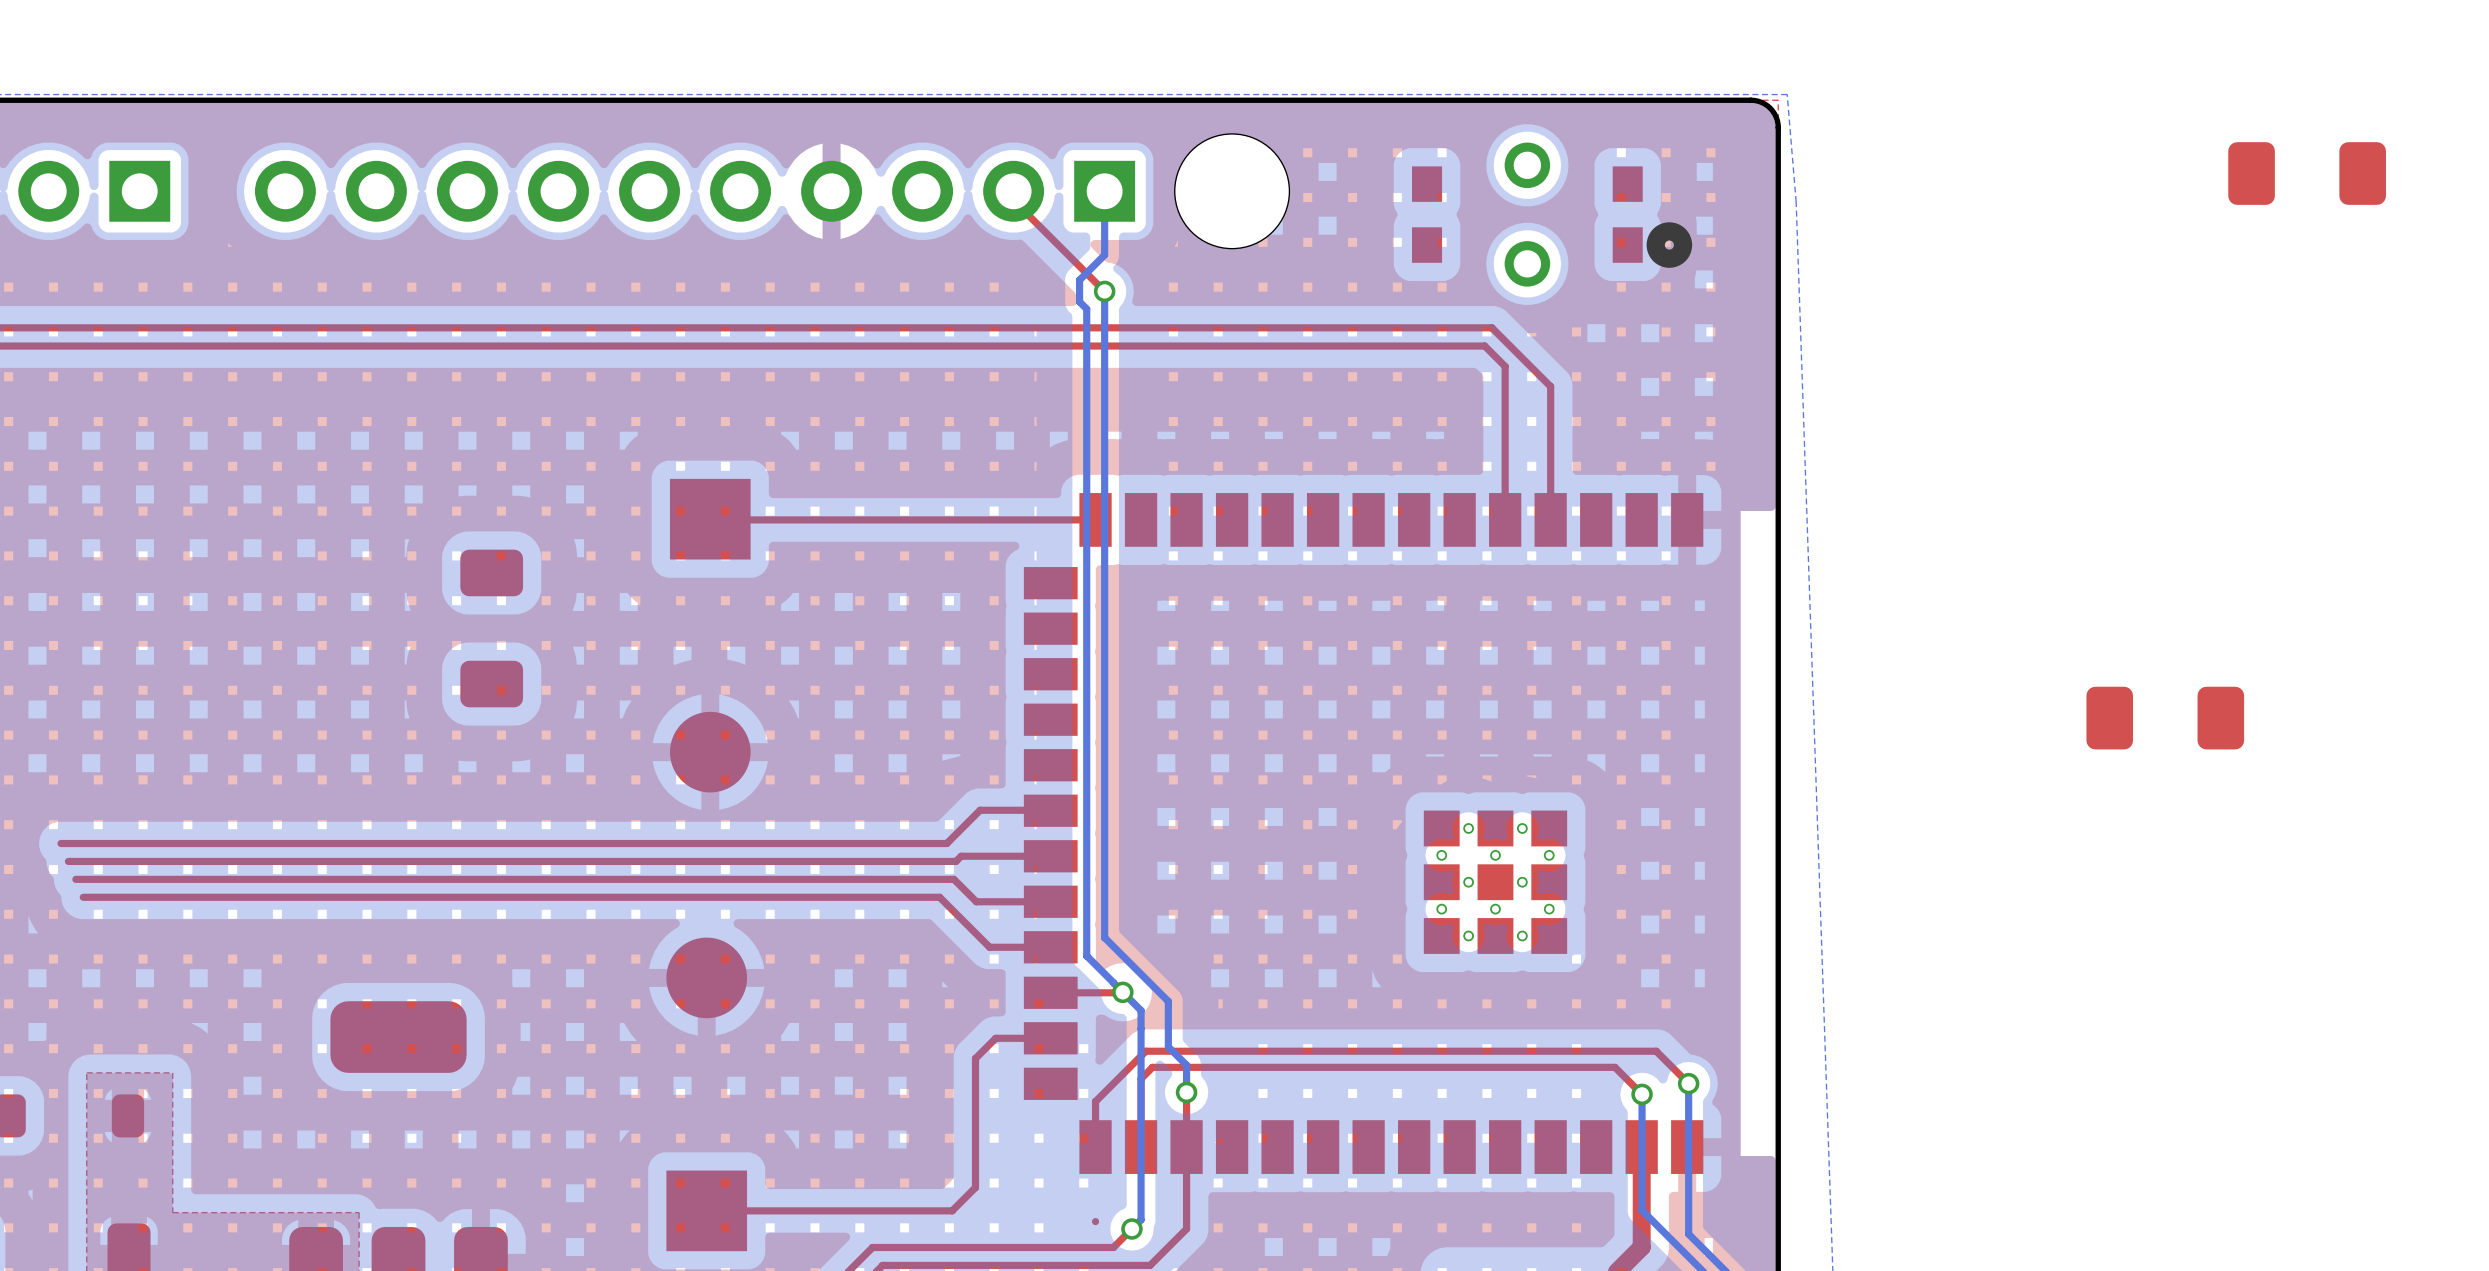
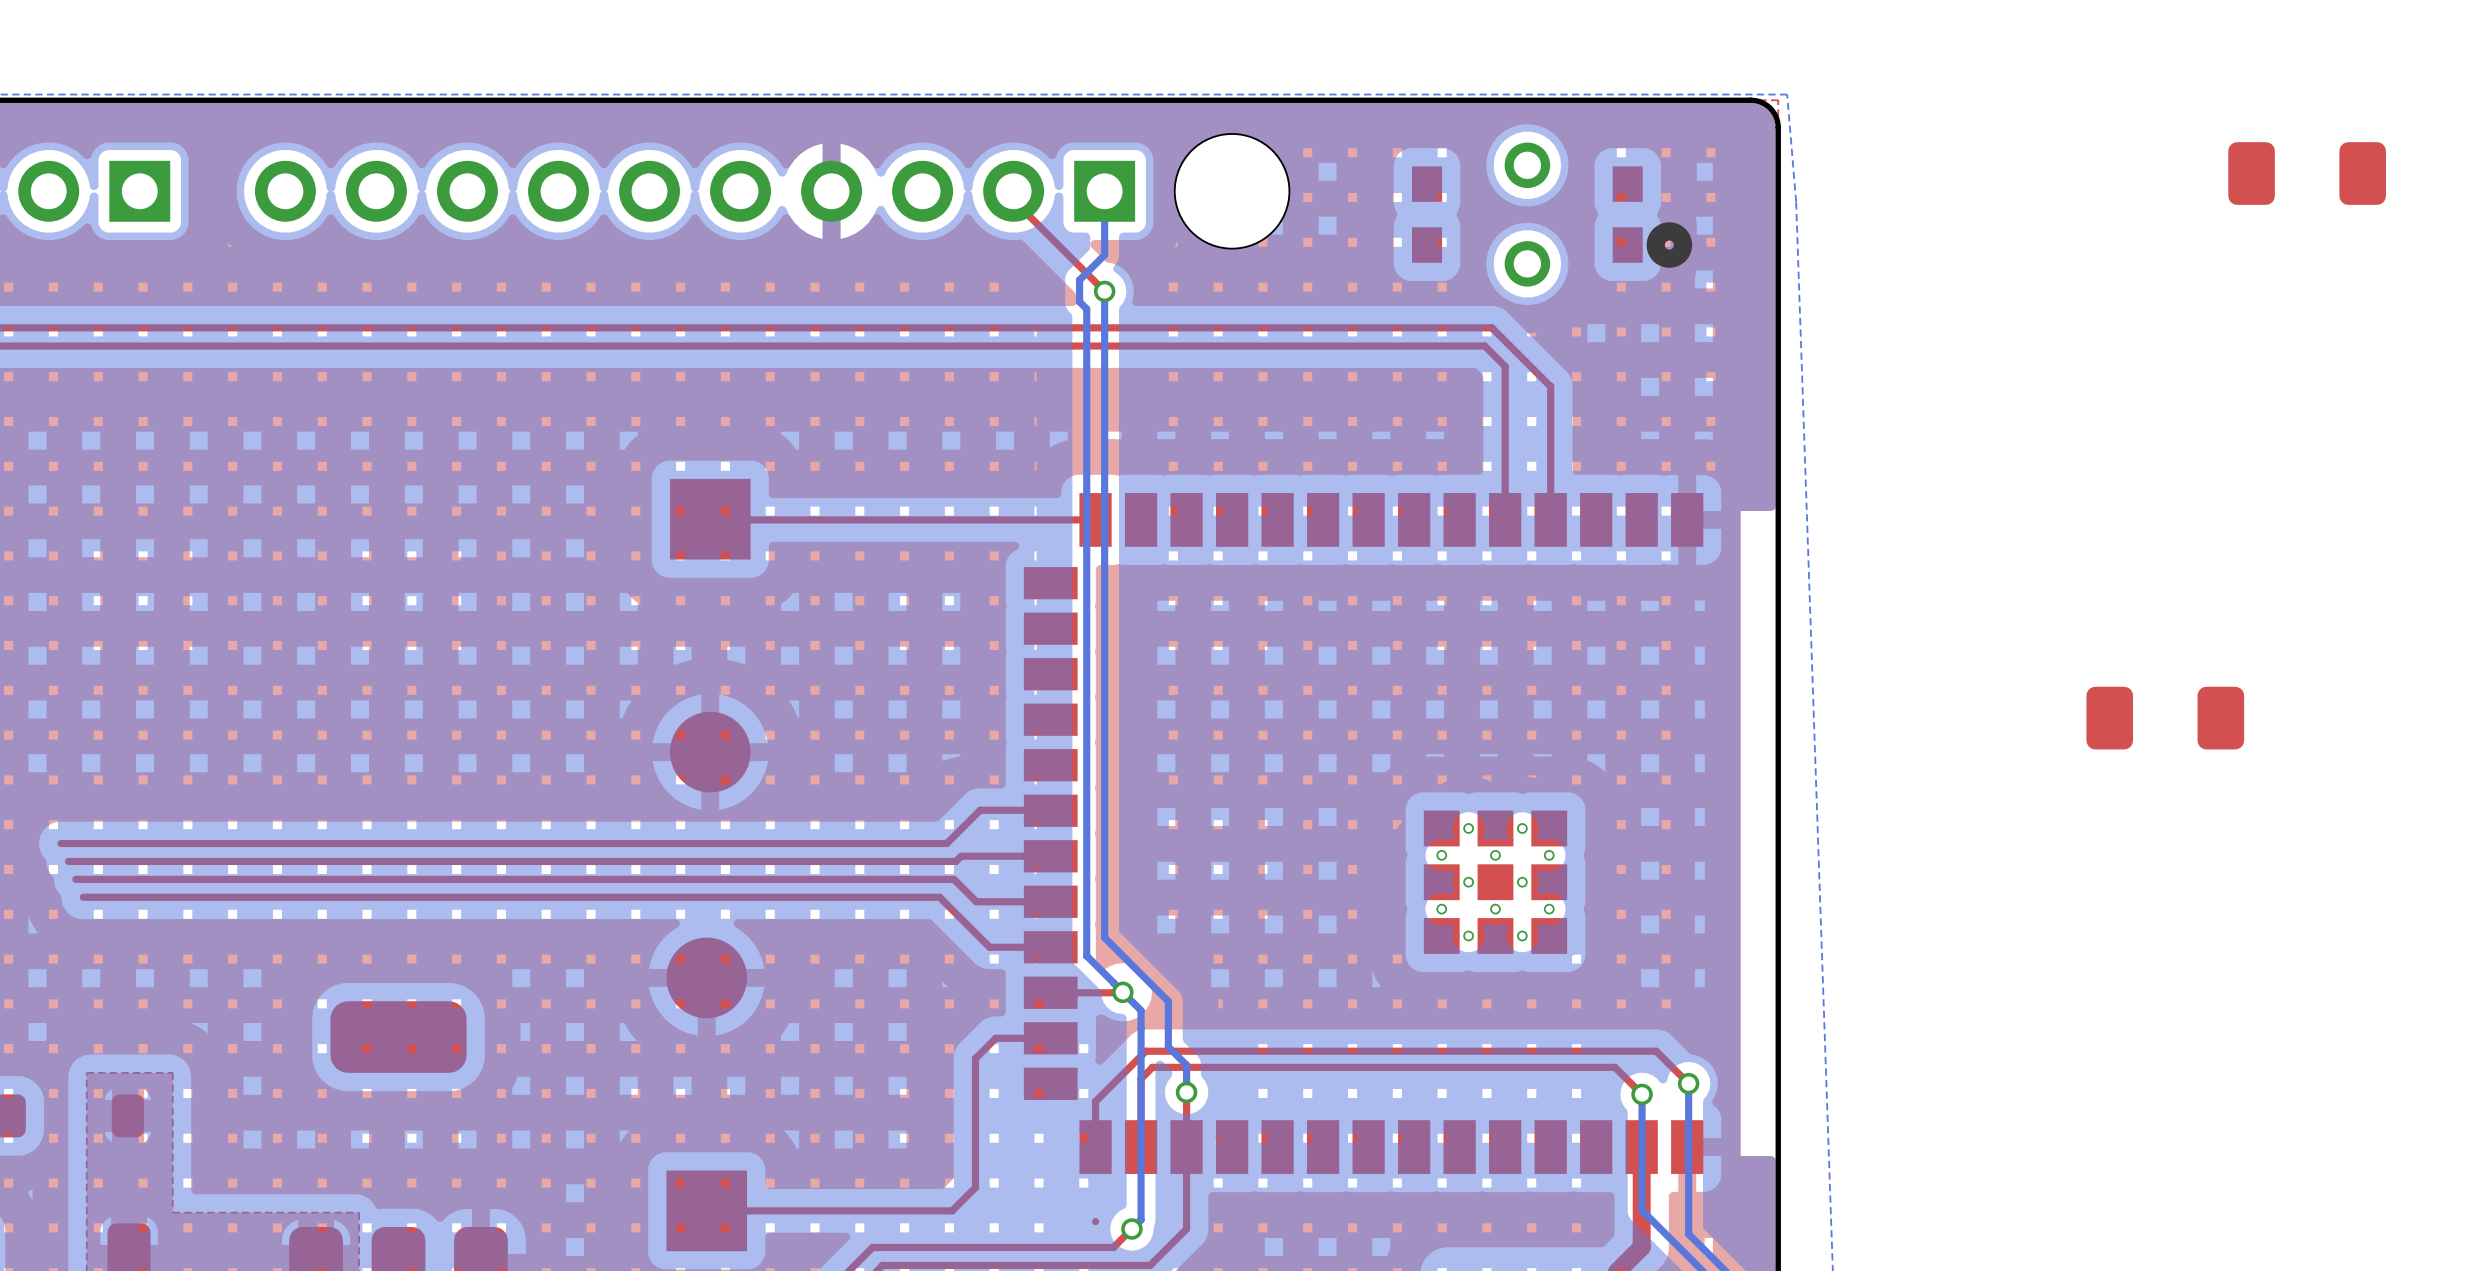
part: (491, 628) -> none

